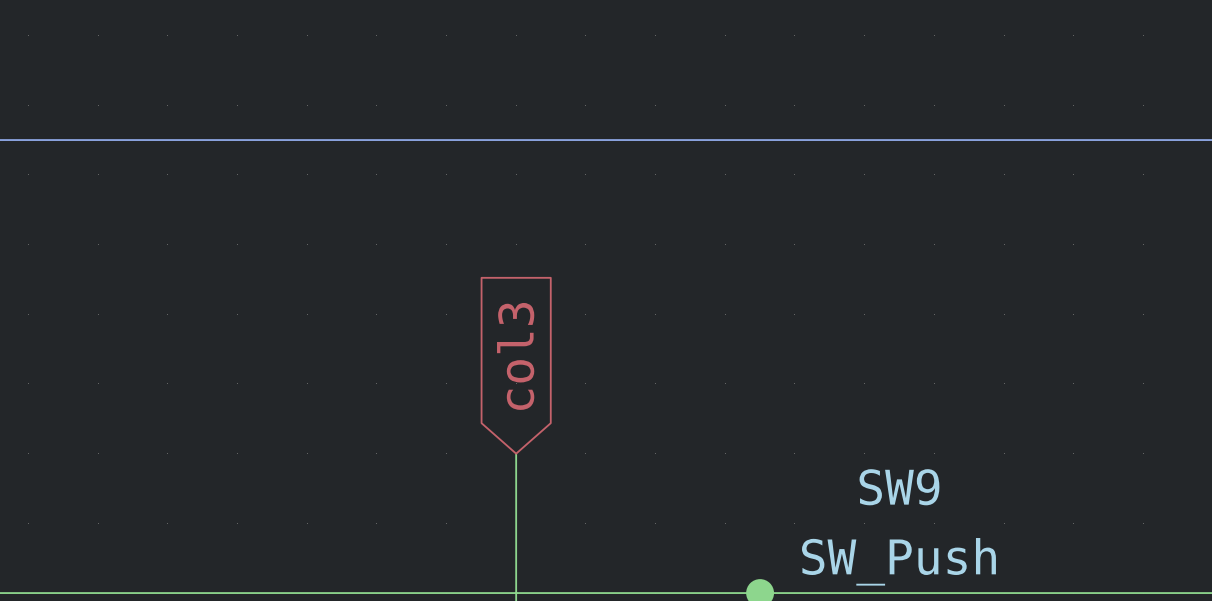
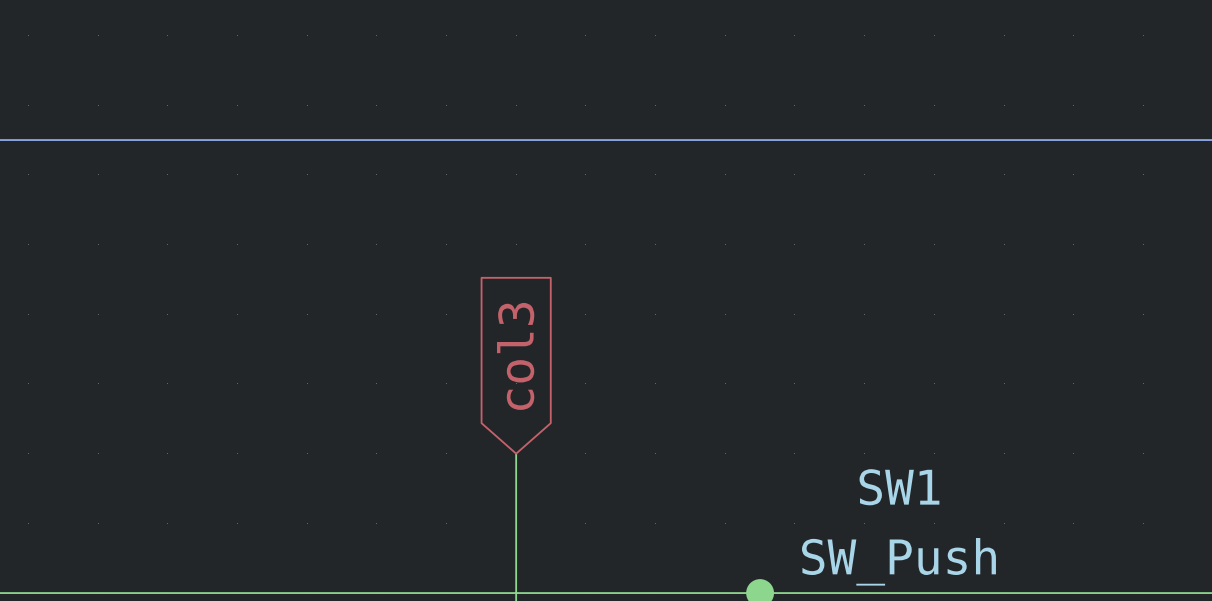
SW9 name: SW9 (899, 487) -> SW1 (899, 487)

